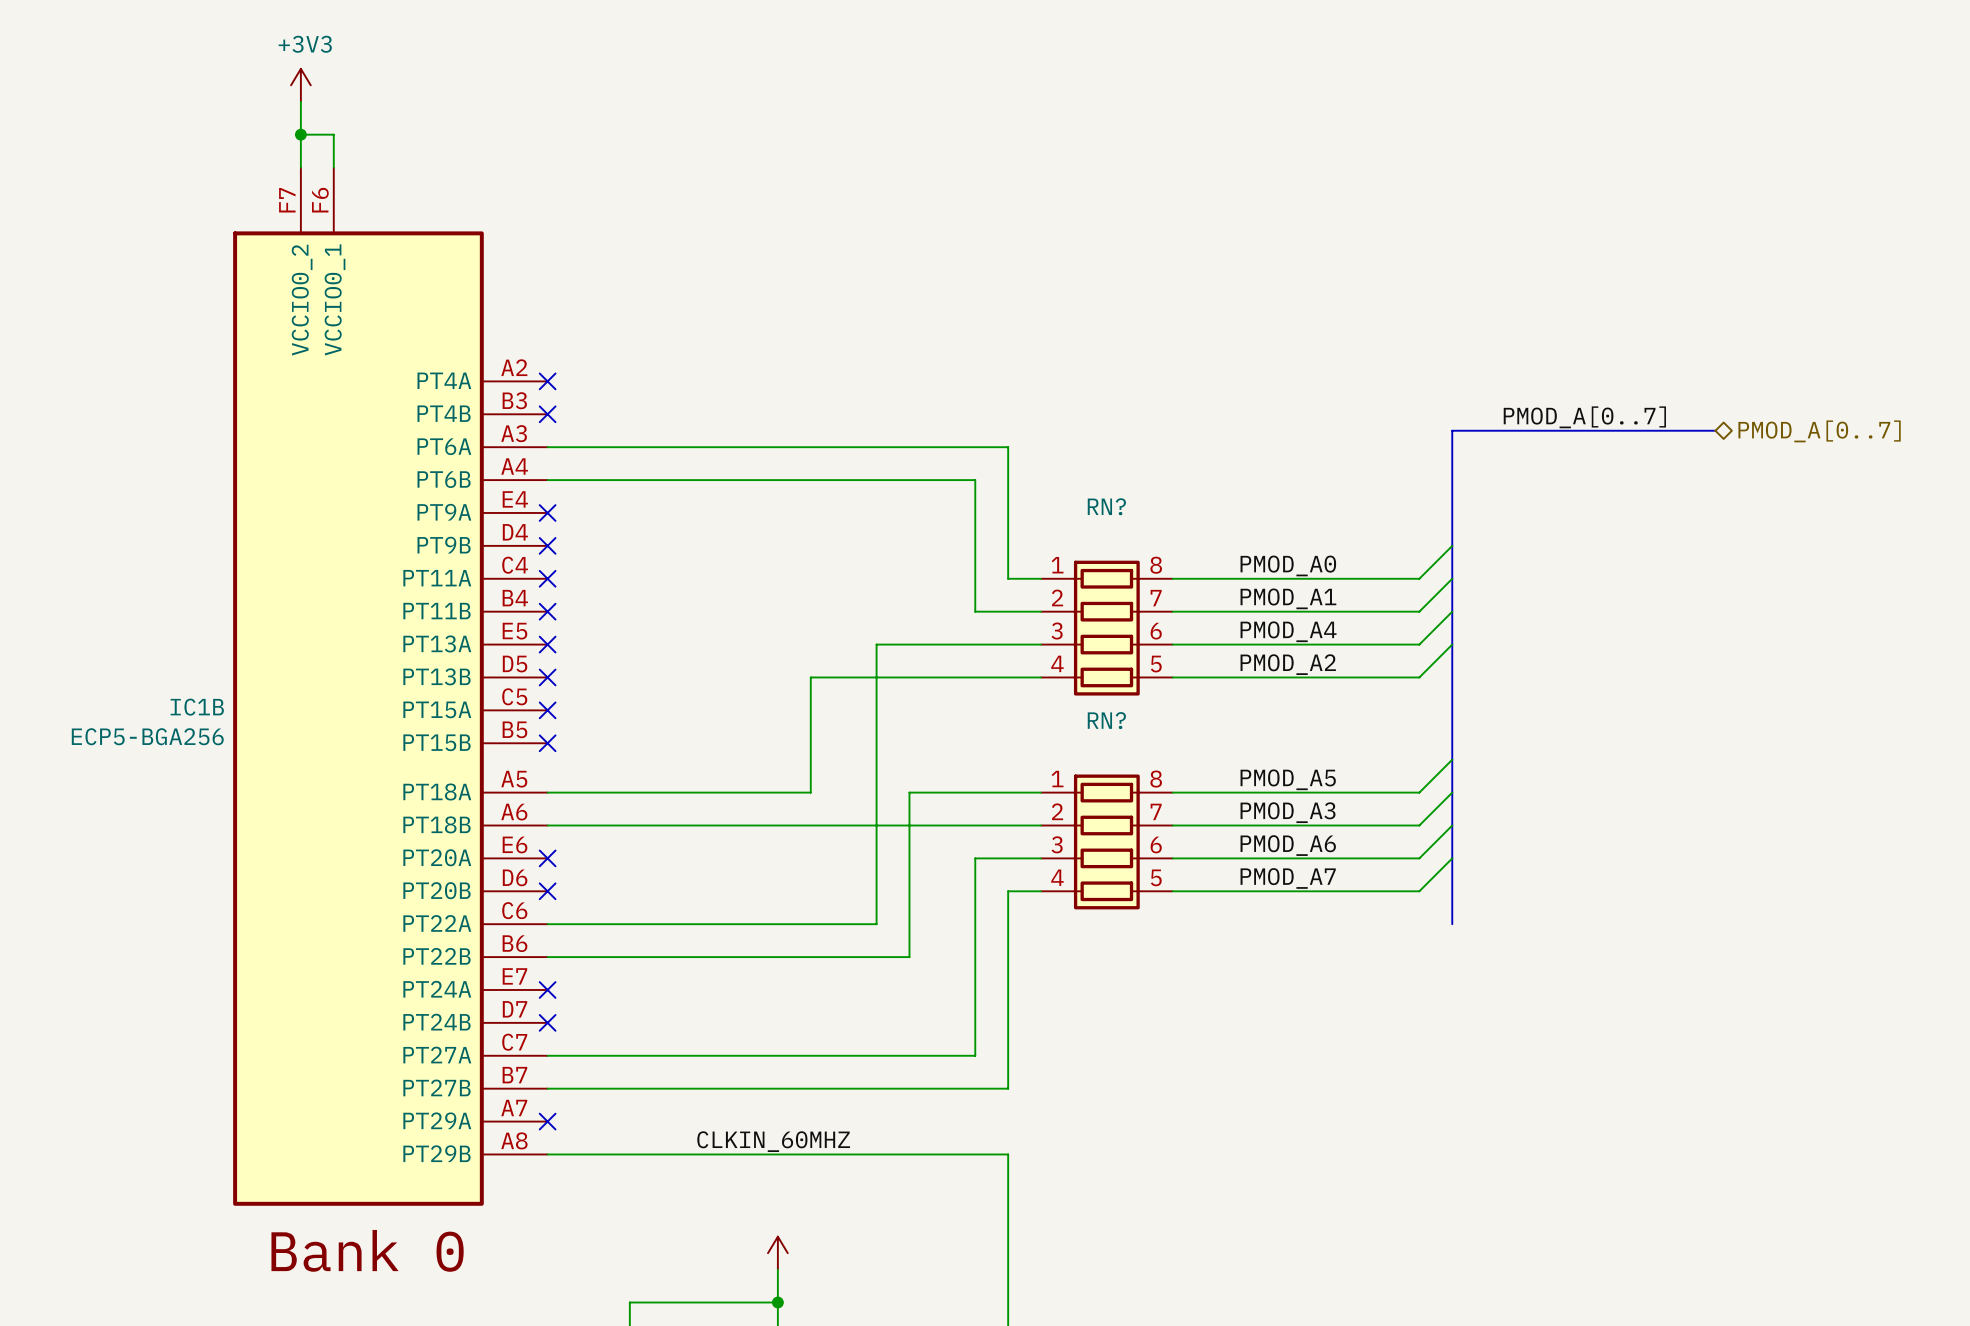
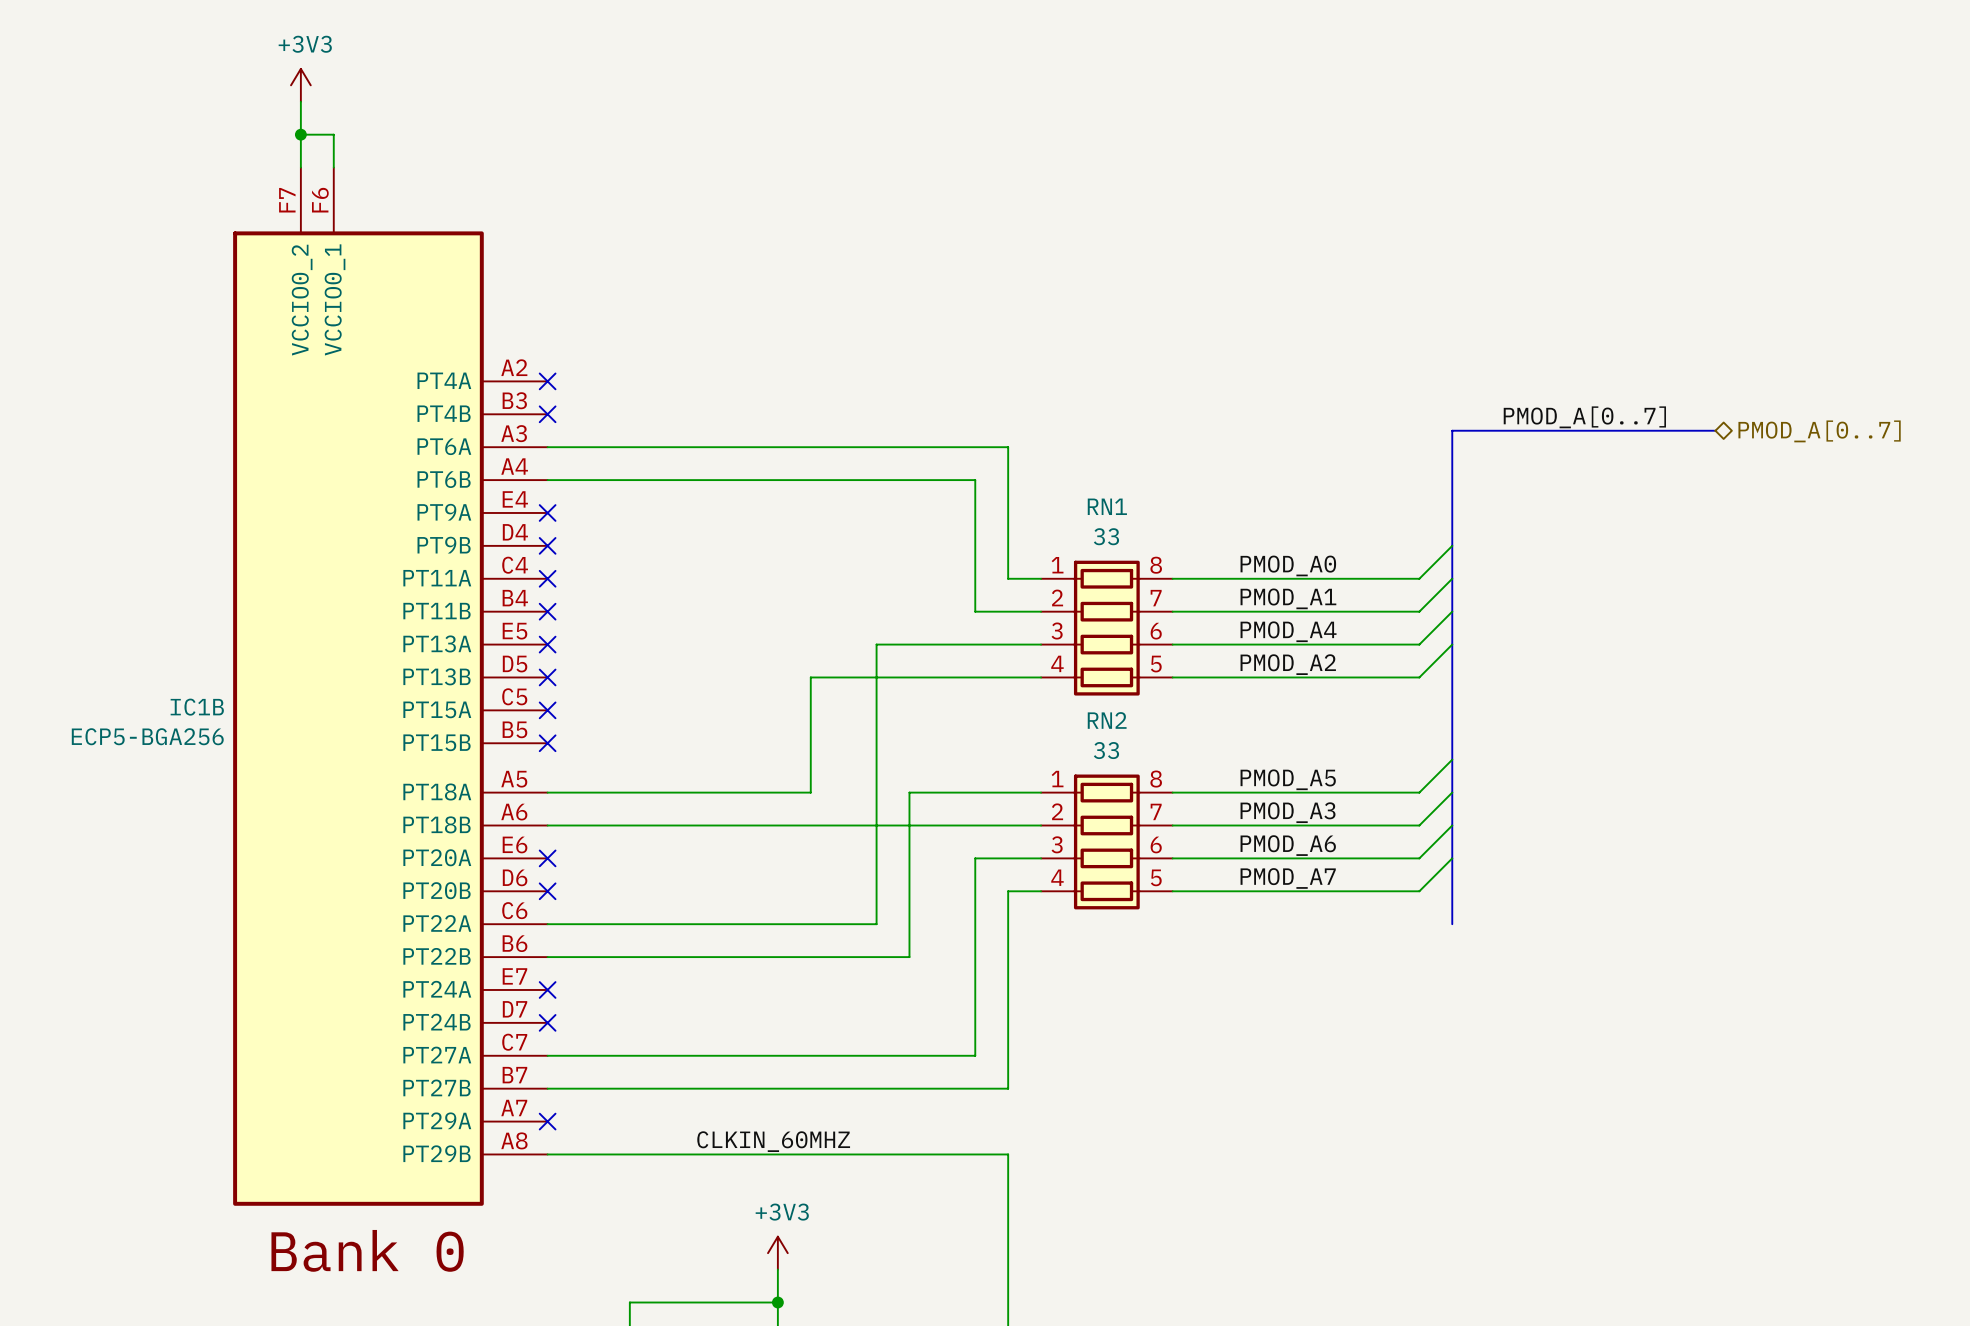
RN? name: RN? (1106, 506) -> RN1 (1107, 506)
RN? value: none -> 33 (1106, 536)
RN? name: RN? (1106, 720) -> RN2 (1107, 720)
RN? value: none -> 33 (1106, 750)
power symbol text: none -> +3V3 (782, 1212)

